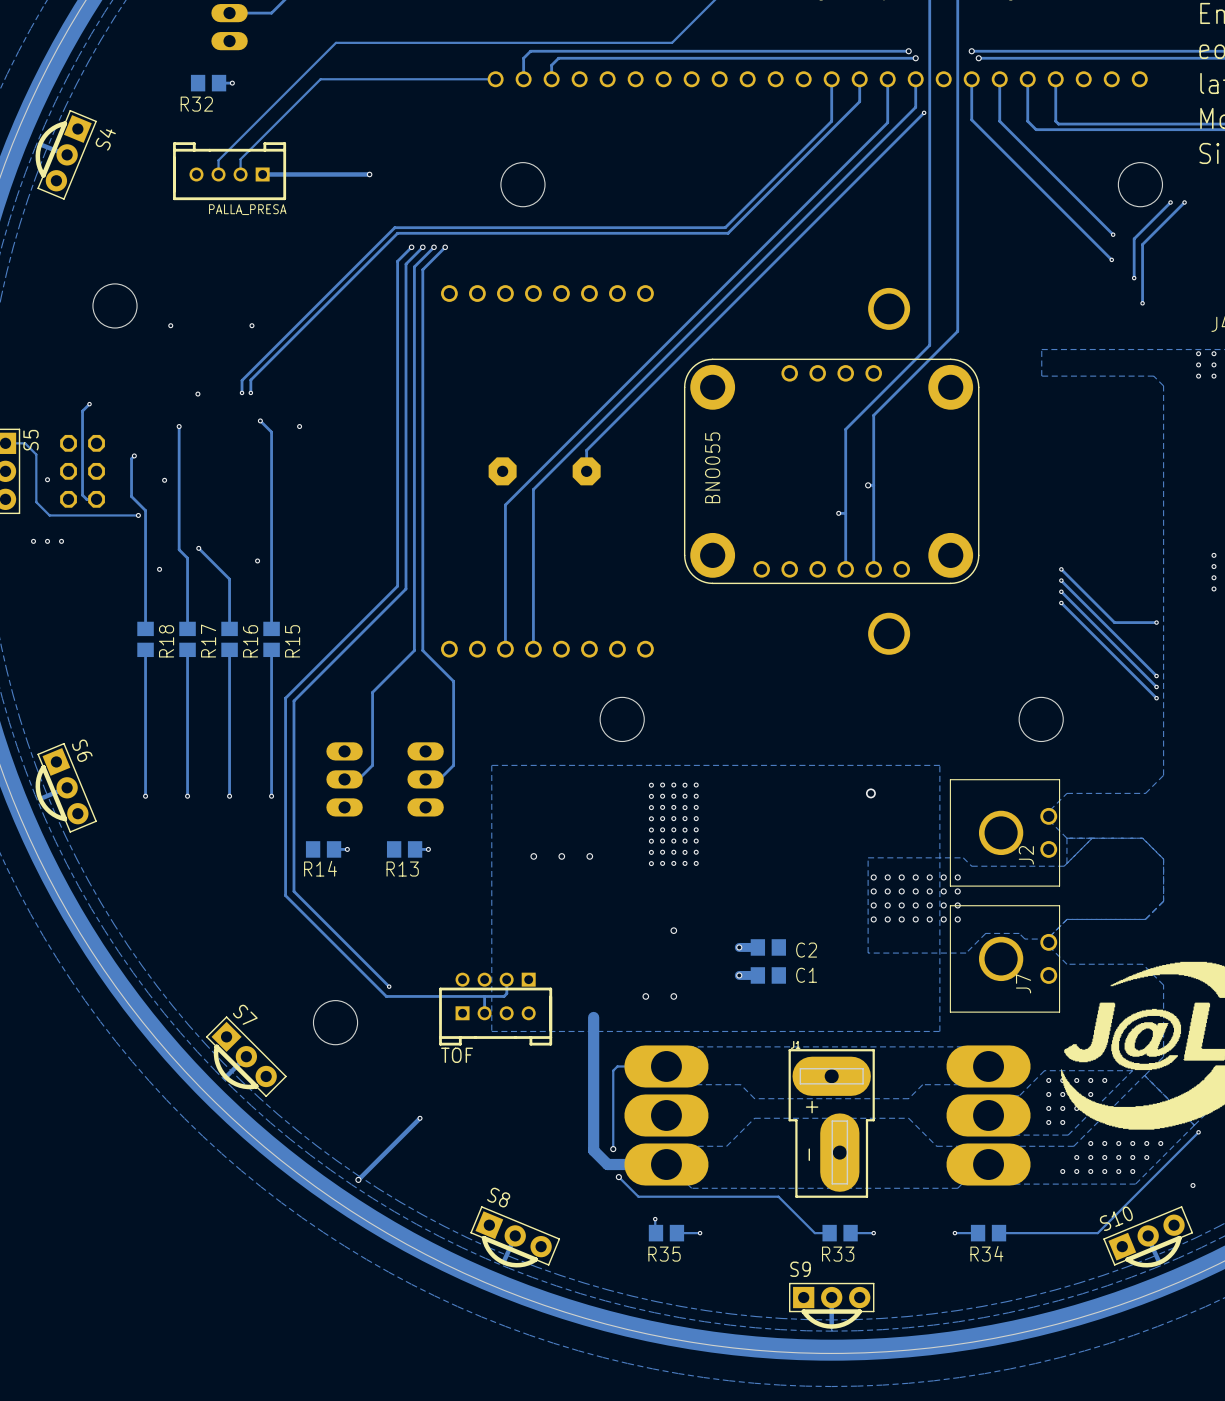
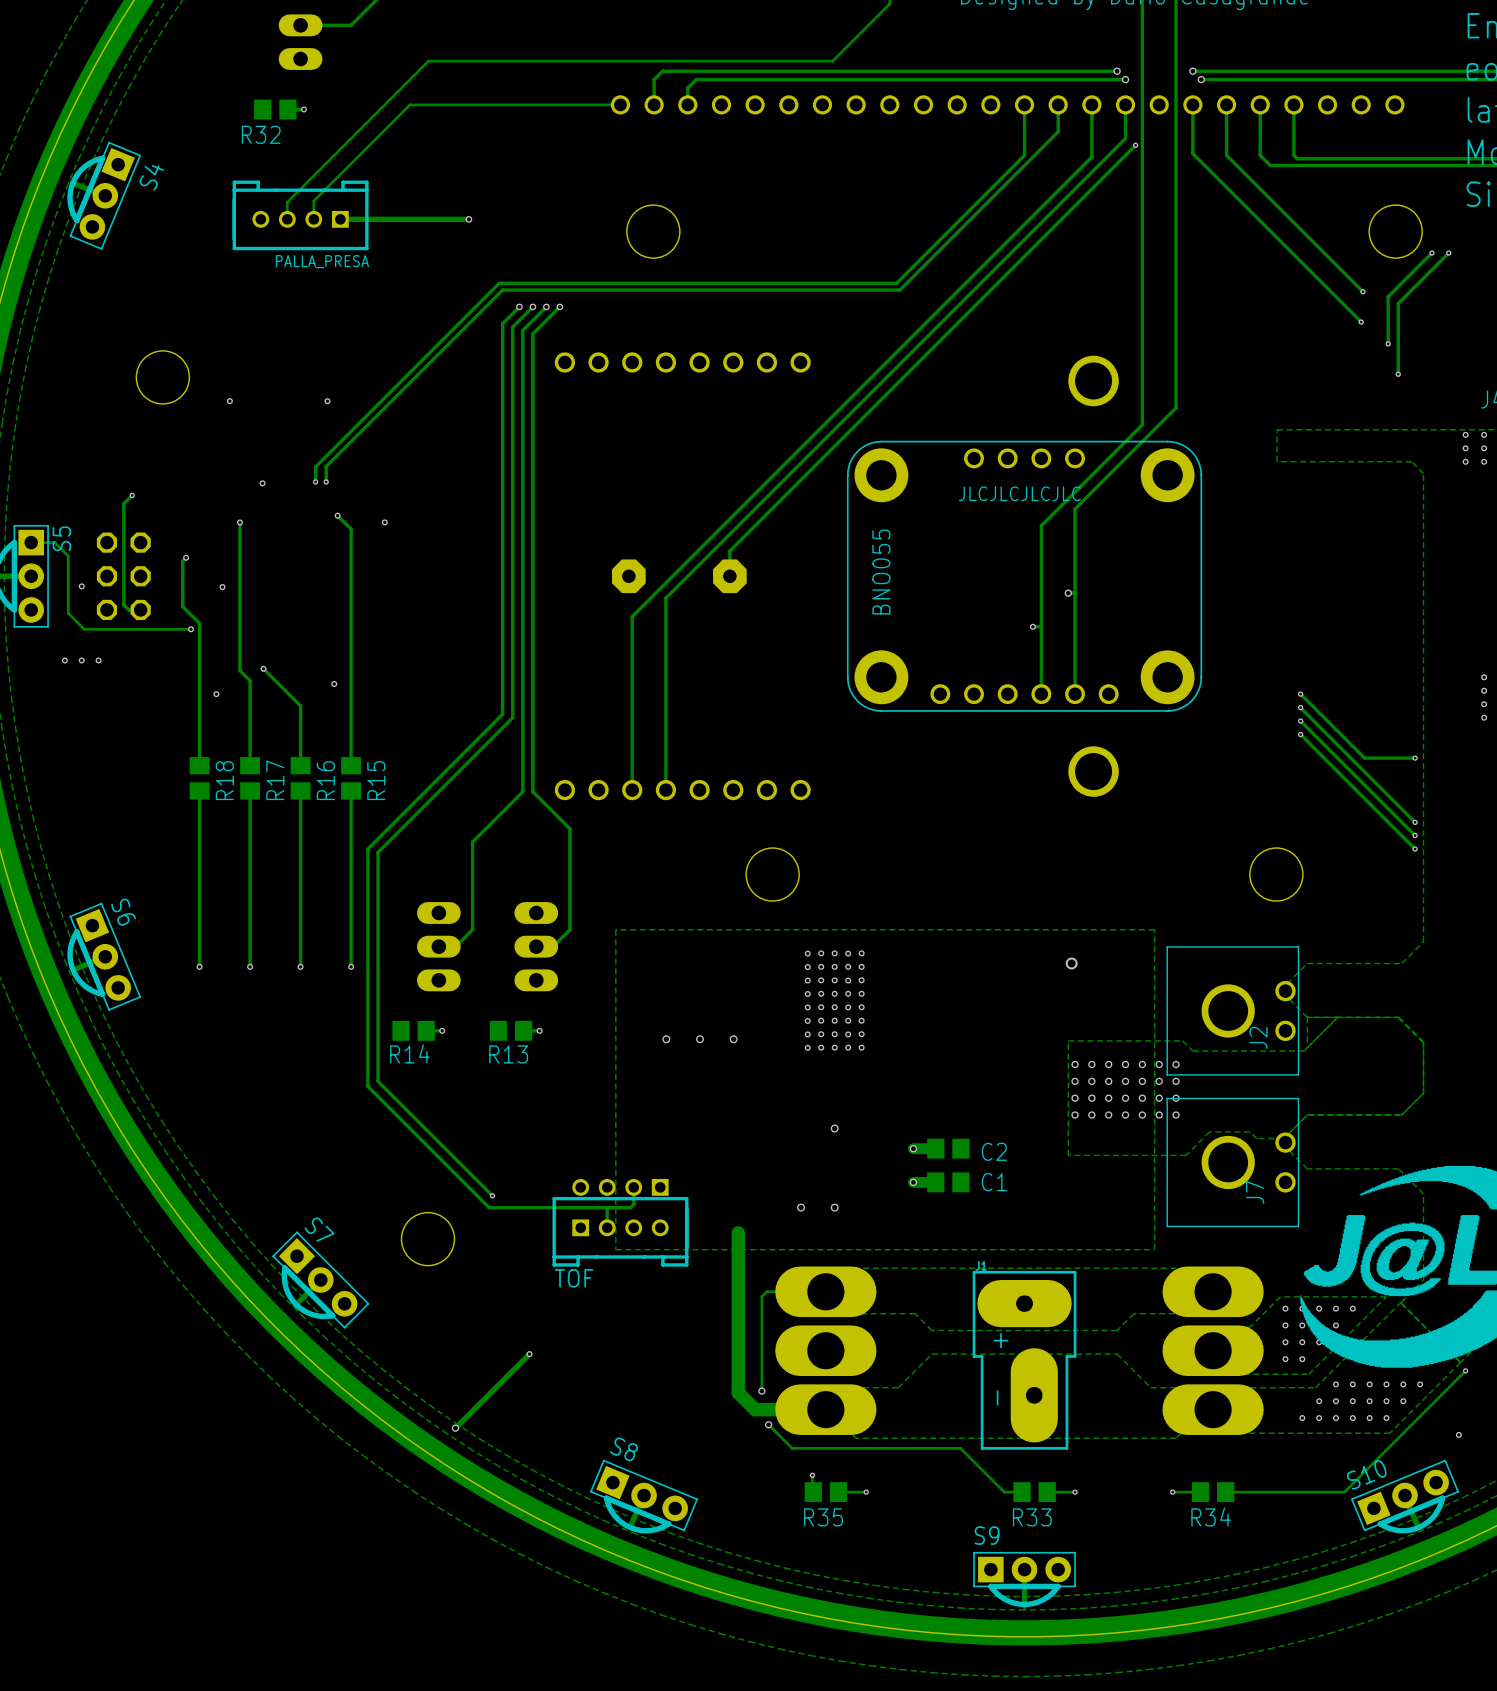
text: none -> JLCJLCJLCJLC (1019, 493)

